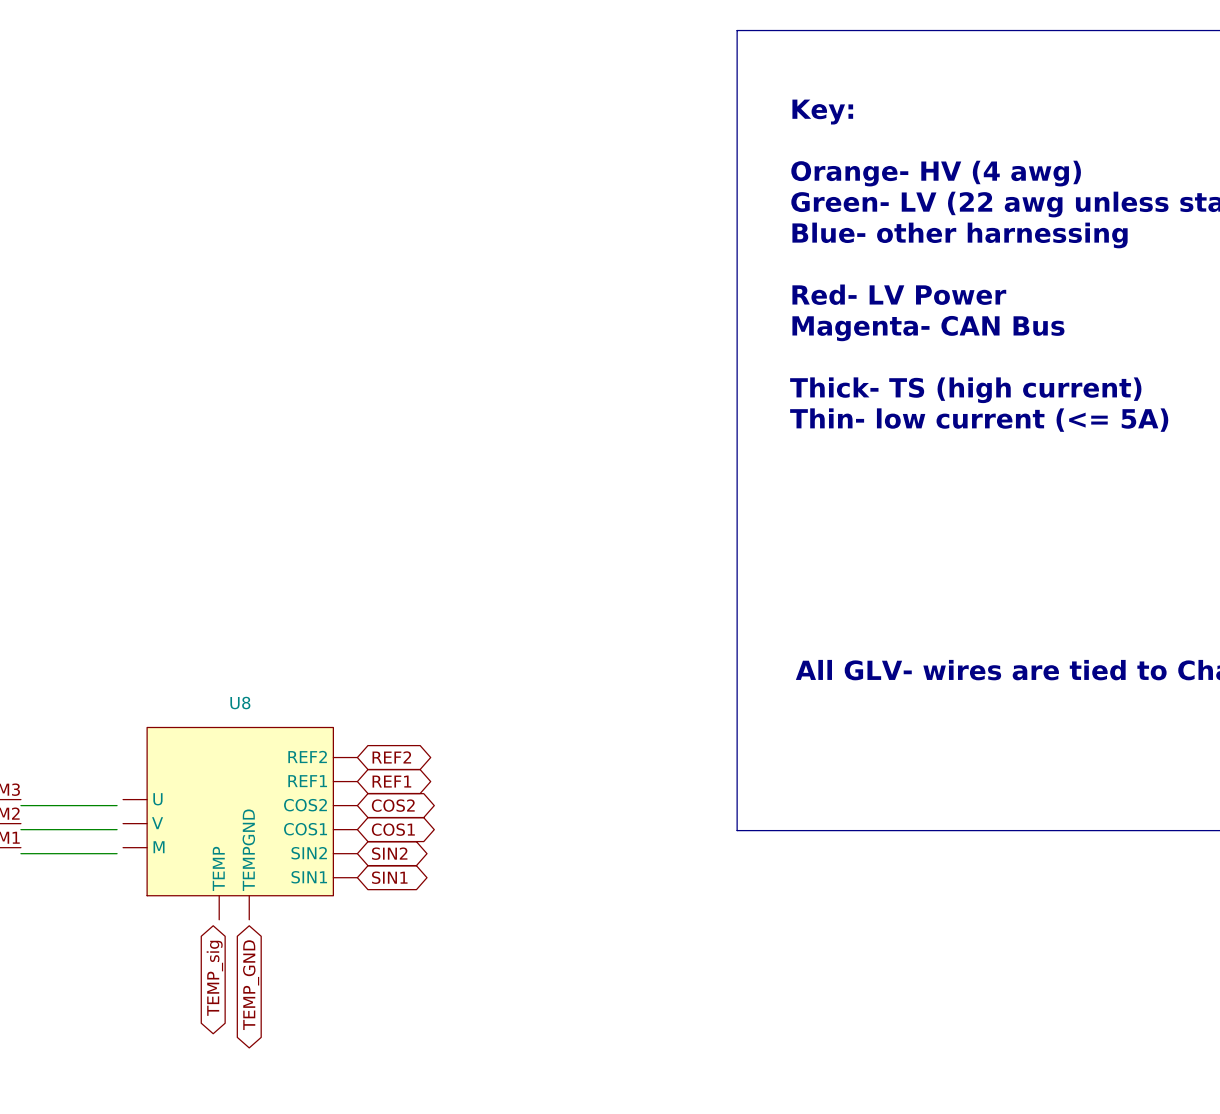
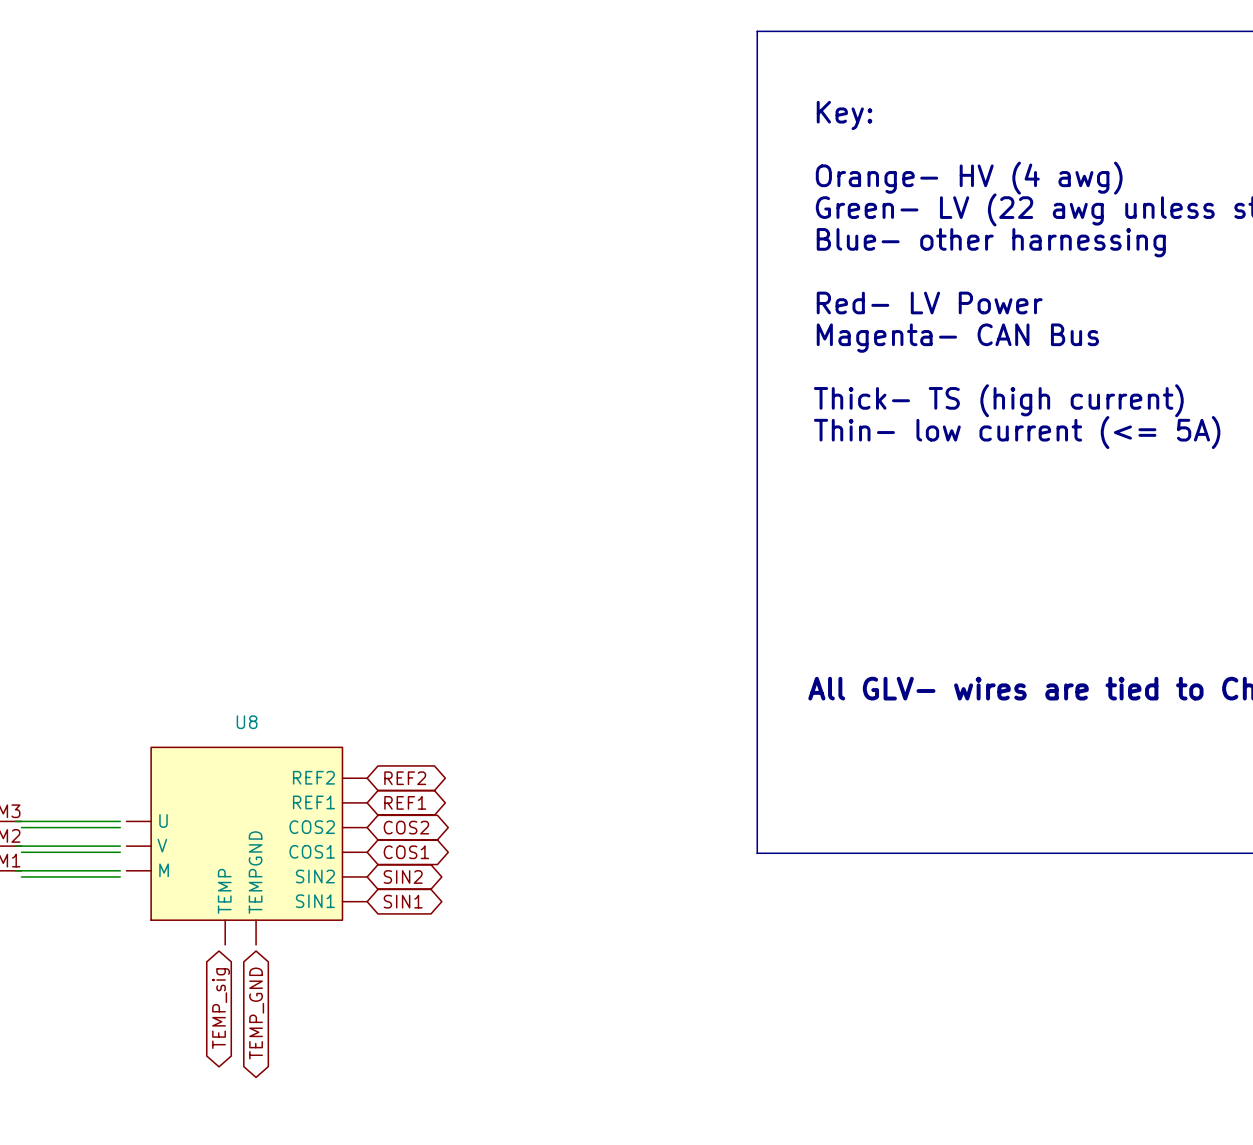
wire: none -> (15, 821) (120, 821)
wire: none -> (15, 846) (120, 846)
wire: none -> (15, 870) (120, 870)

